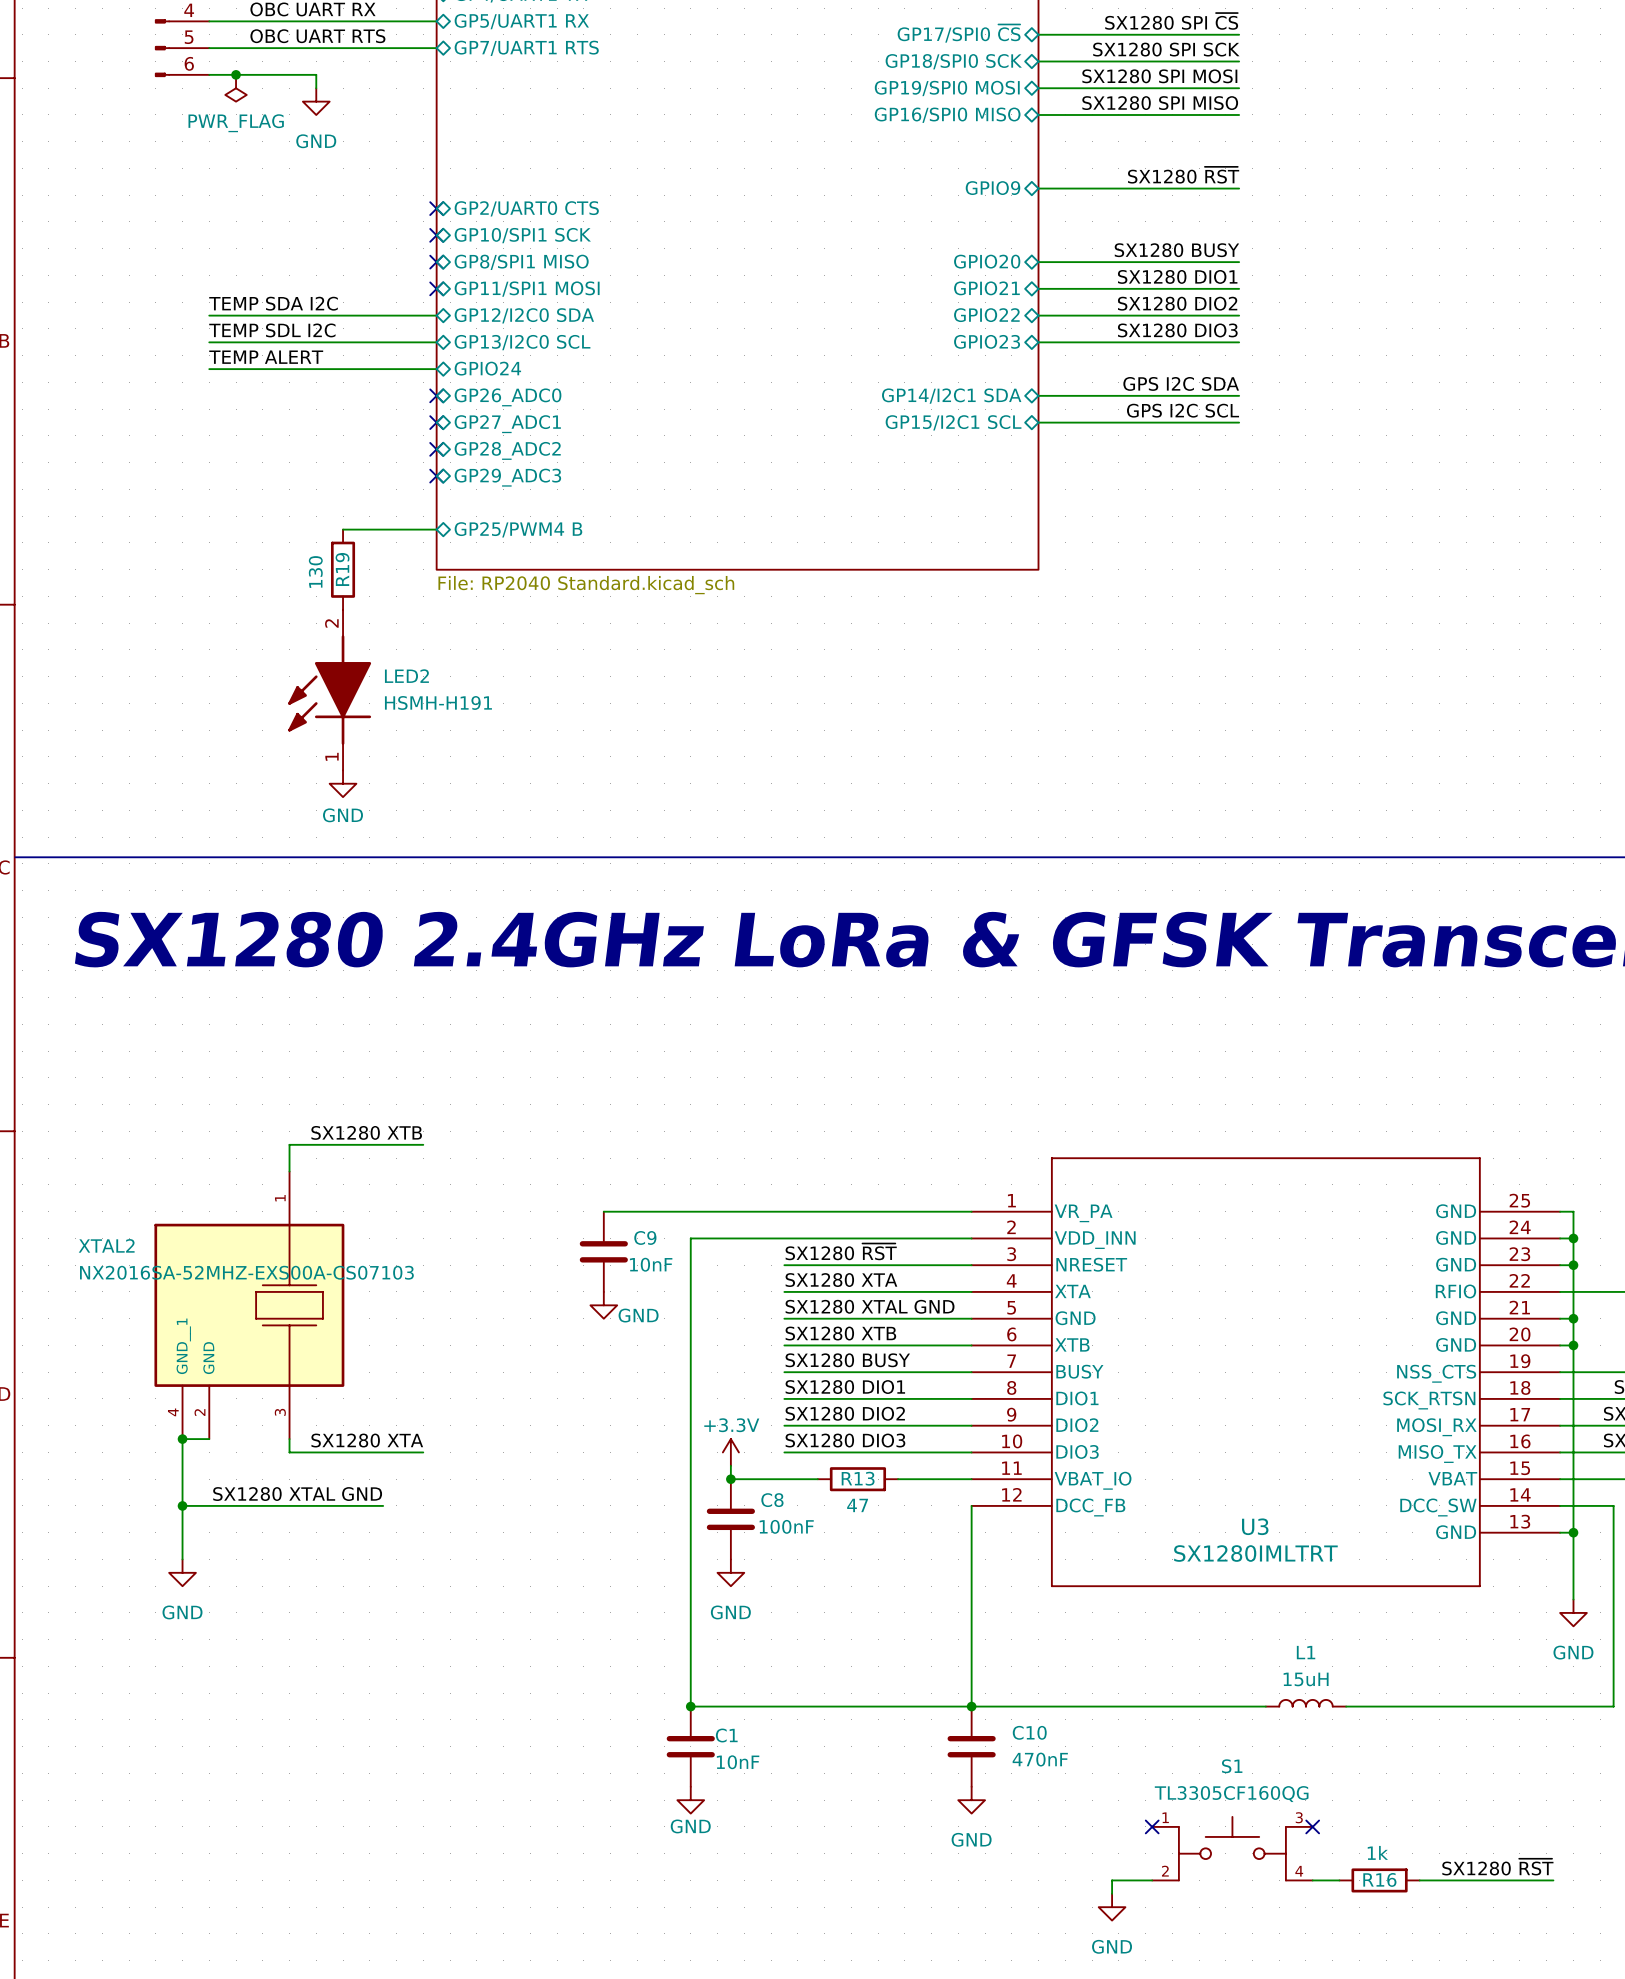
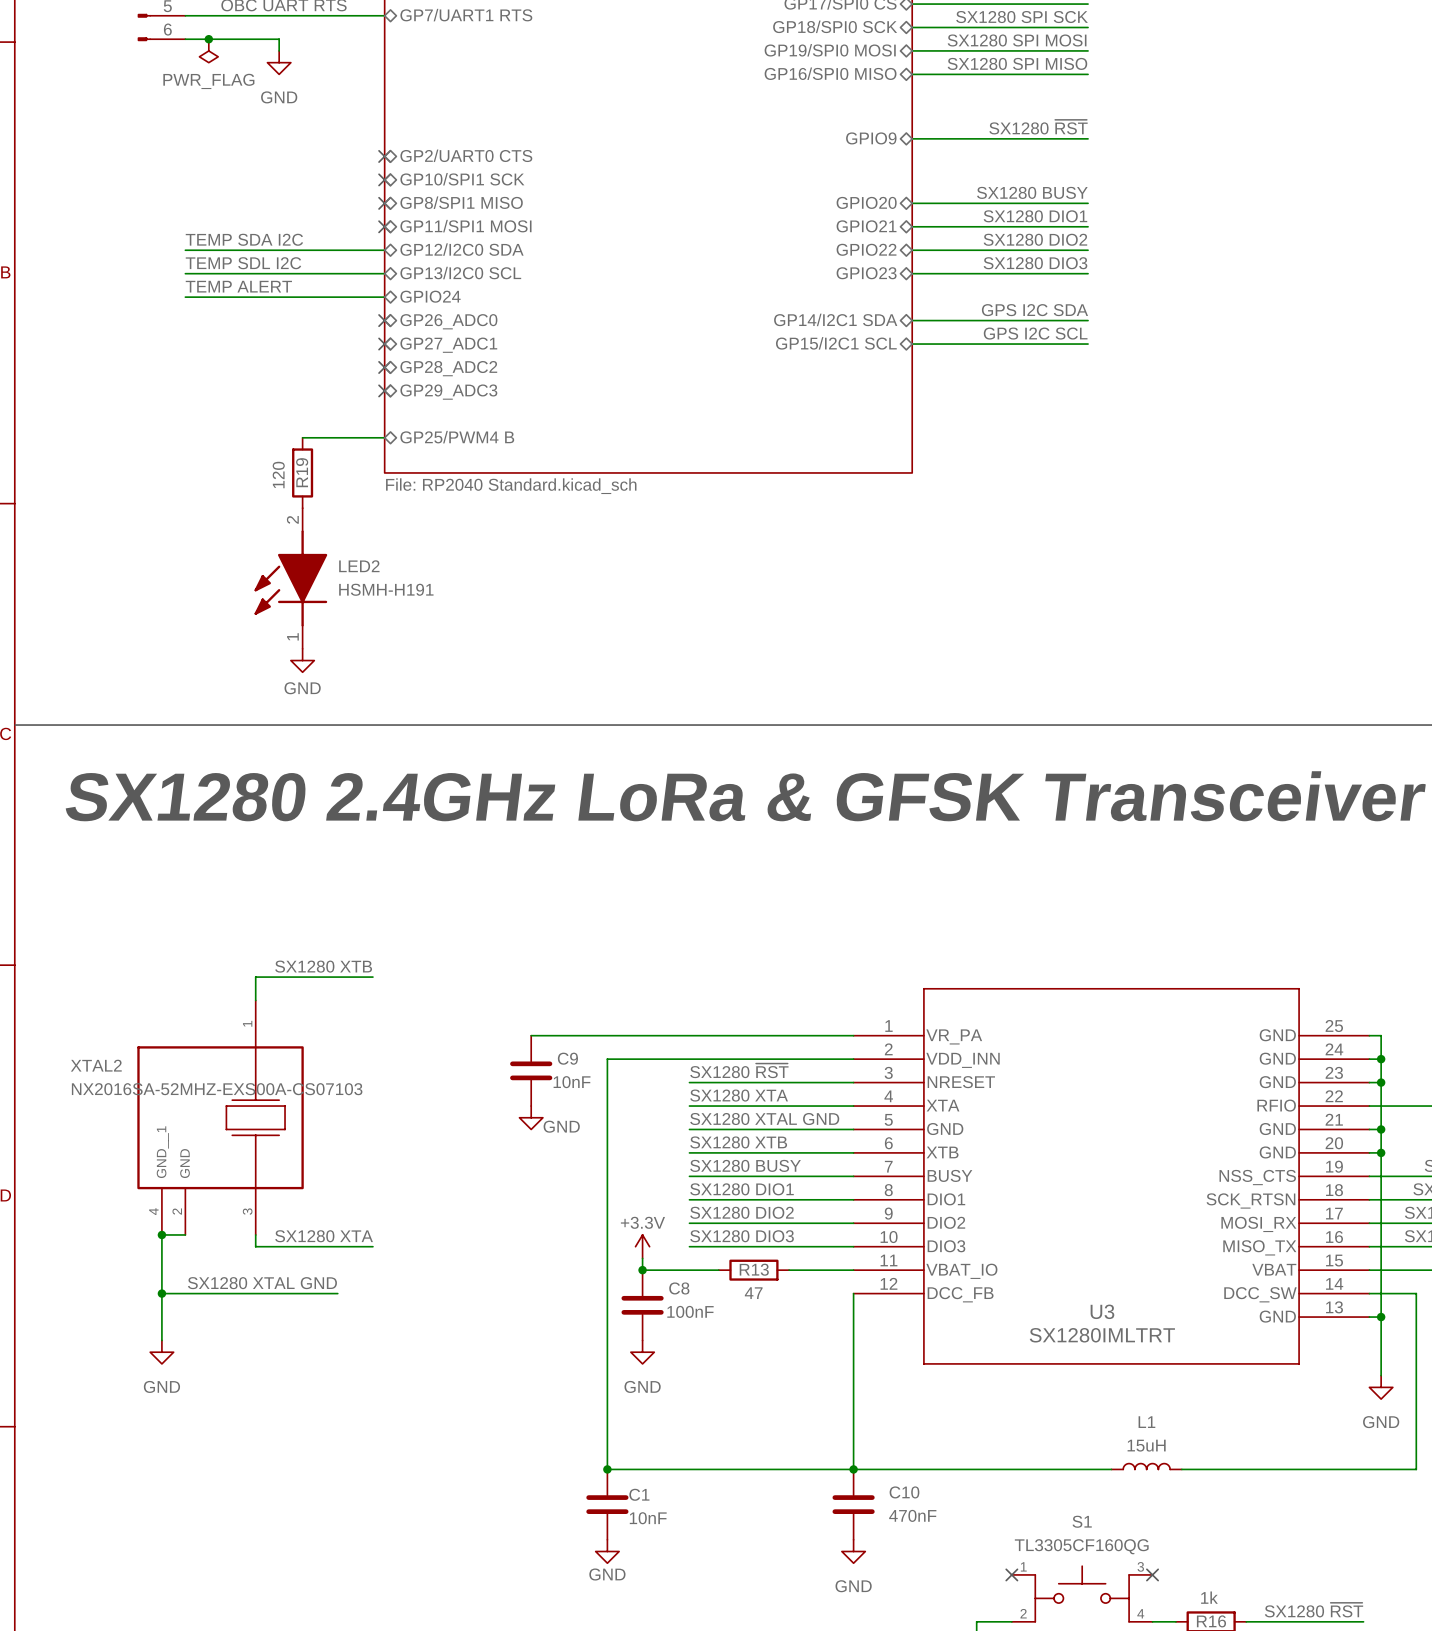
R19 value: 130 (315, 572) -> 120 (278, 475)

